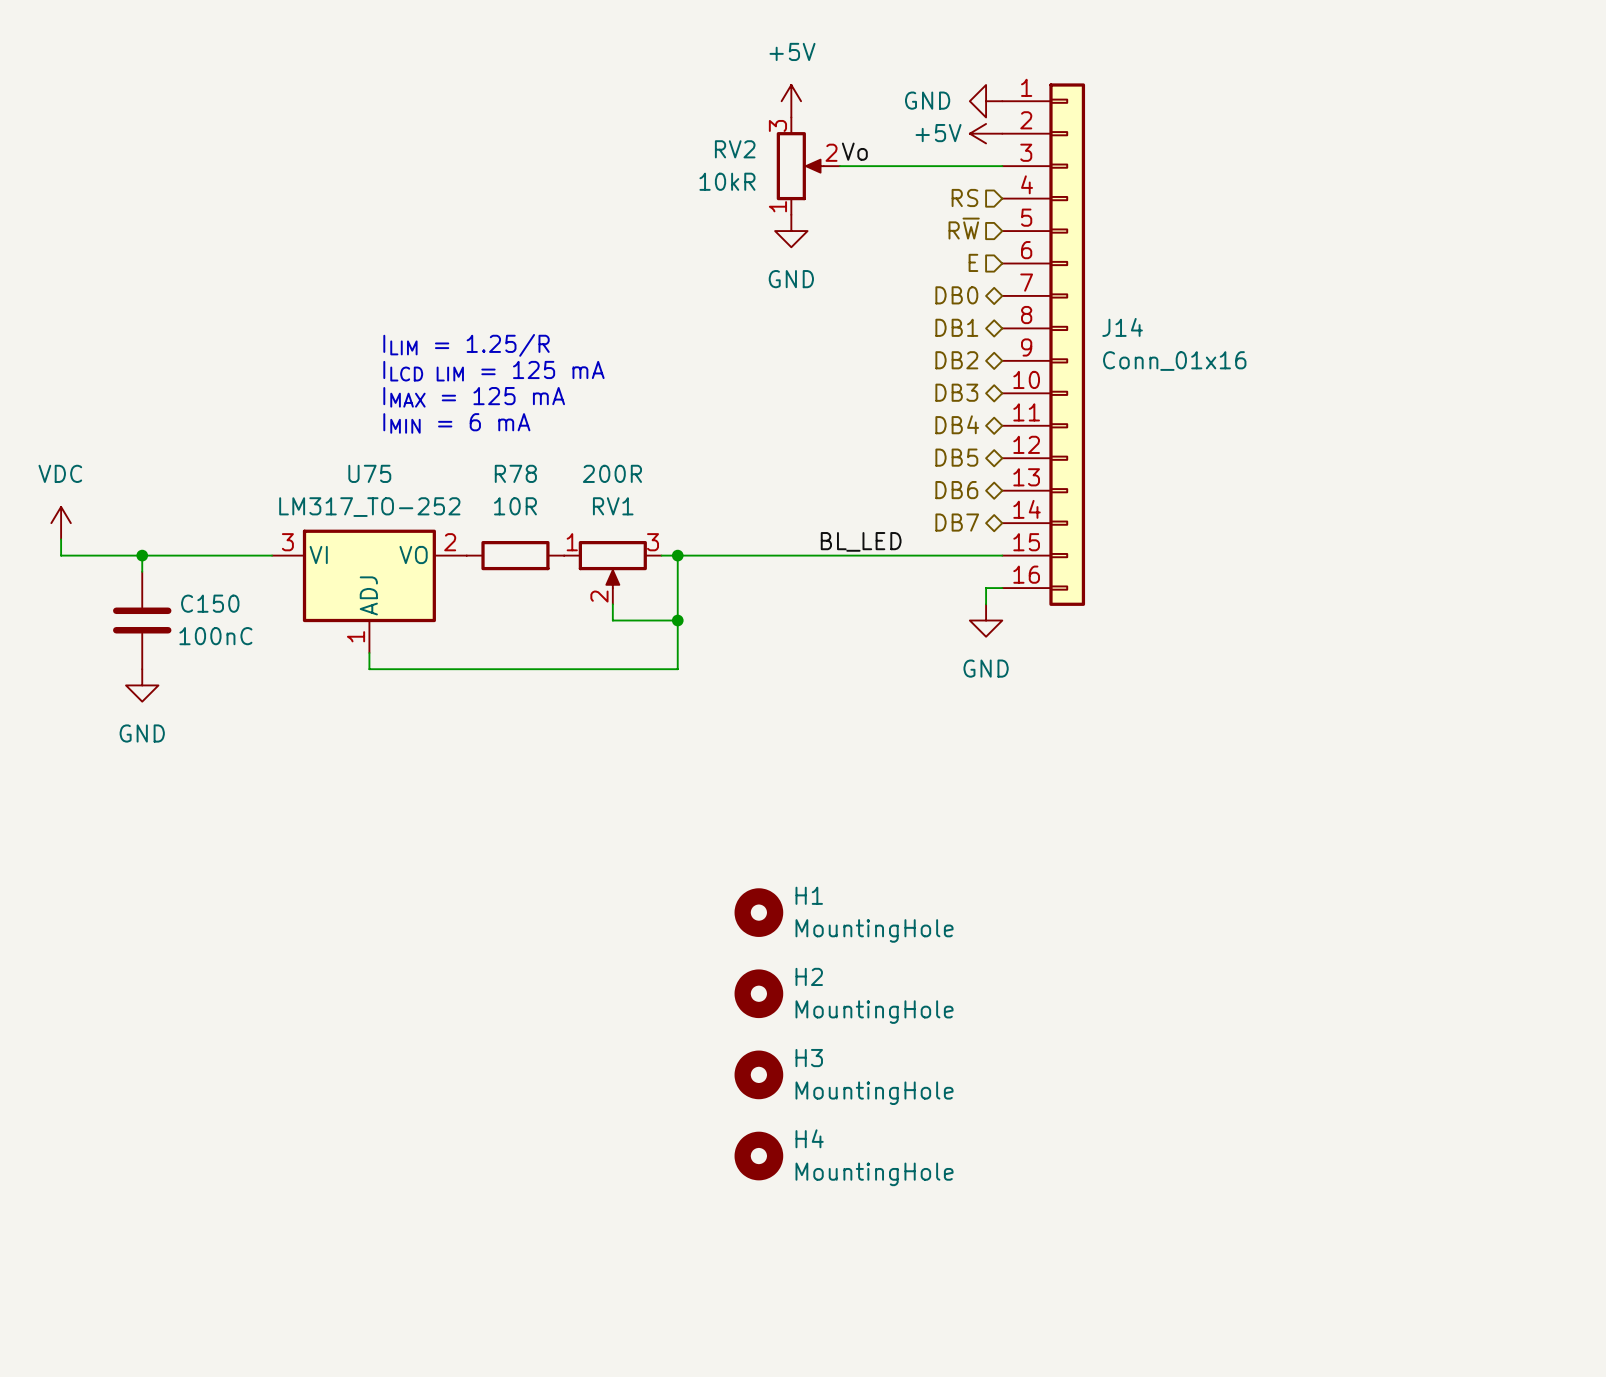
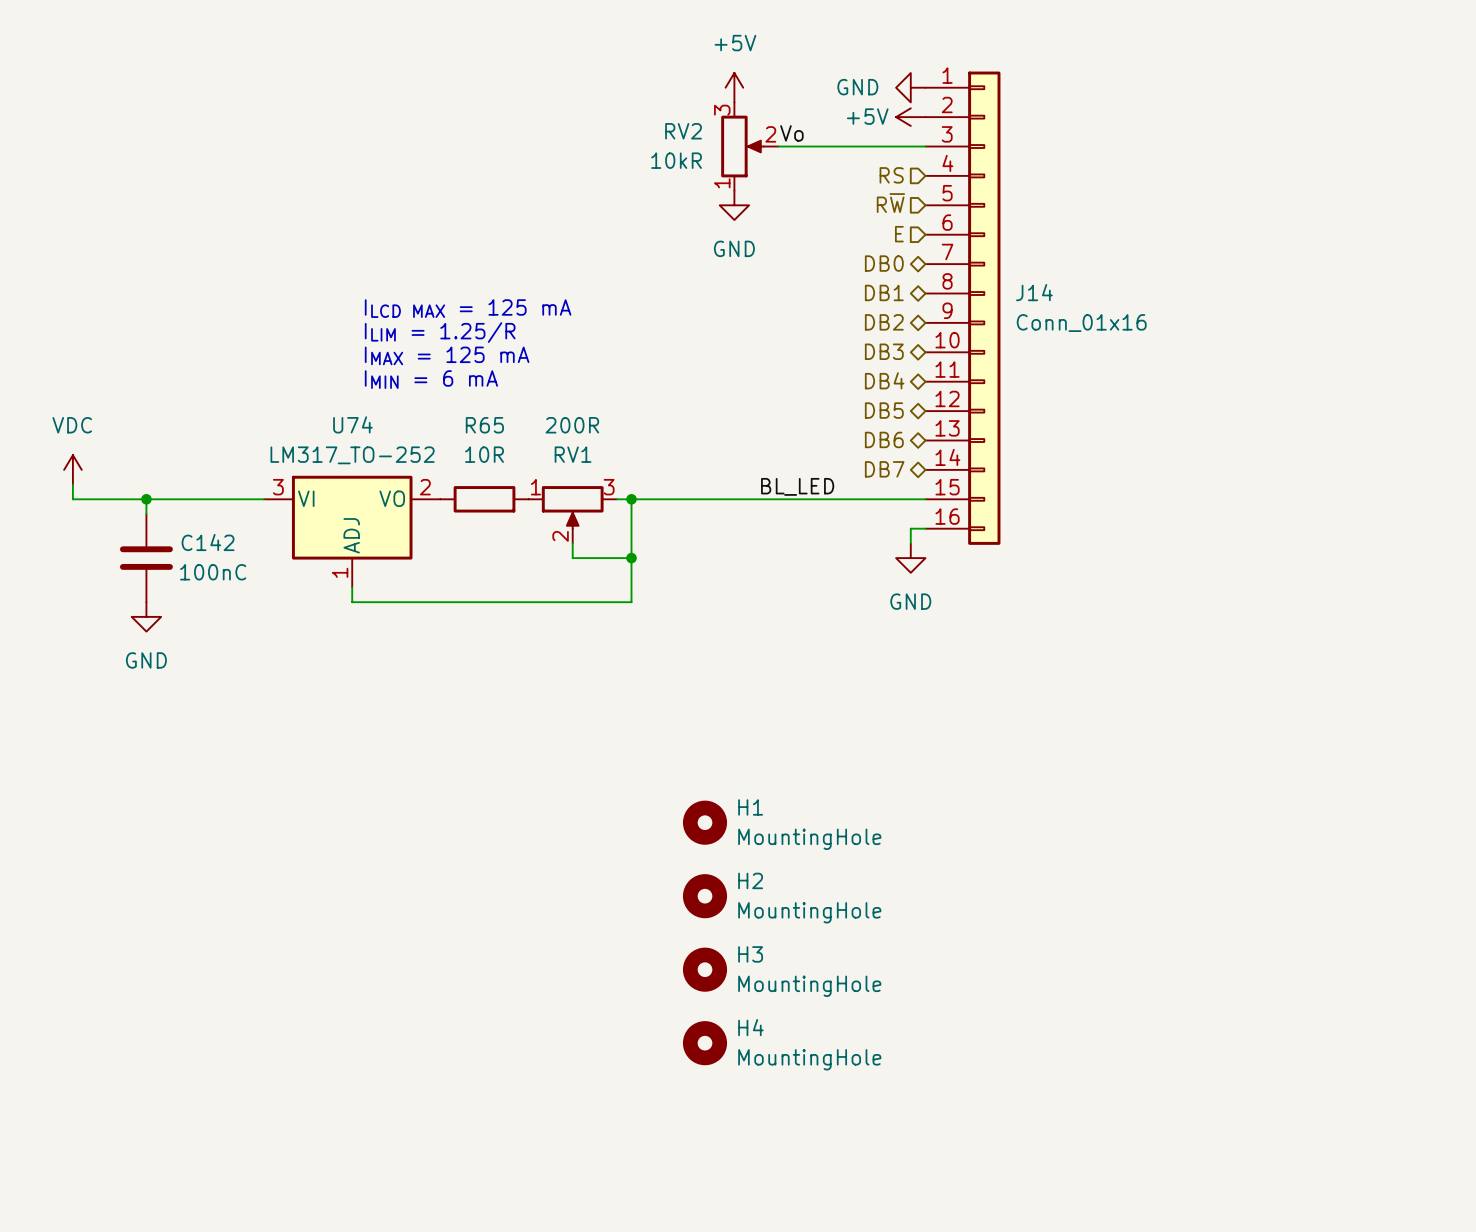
text: ILIM = 1.25/R (466, 345) -> ILCD MAX = 125 mA (468, 308)
text: ILCD LIM = 125 mA (493, 371) -> ILIM = 1.25/R (440, 332)
U75 name: U75 (369, 473) -> U74 (352, 424)
R78 name: R78 (515, 473) -> R65 (484, 425)
C150 name: C150 (210, 603) -> C142 (208, 542)

